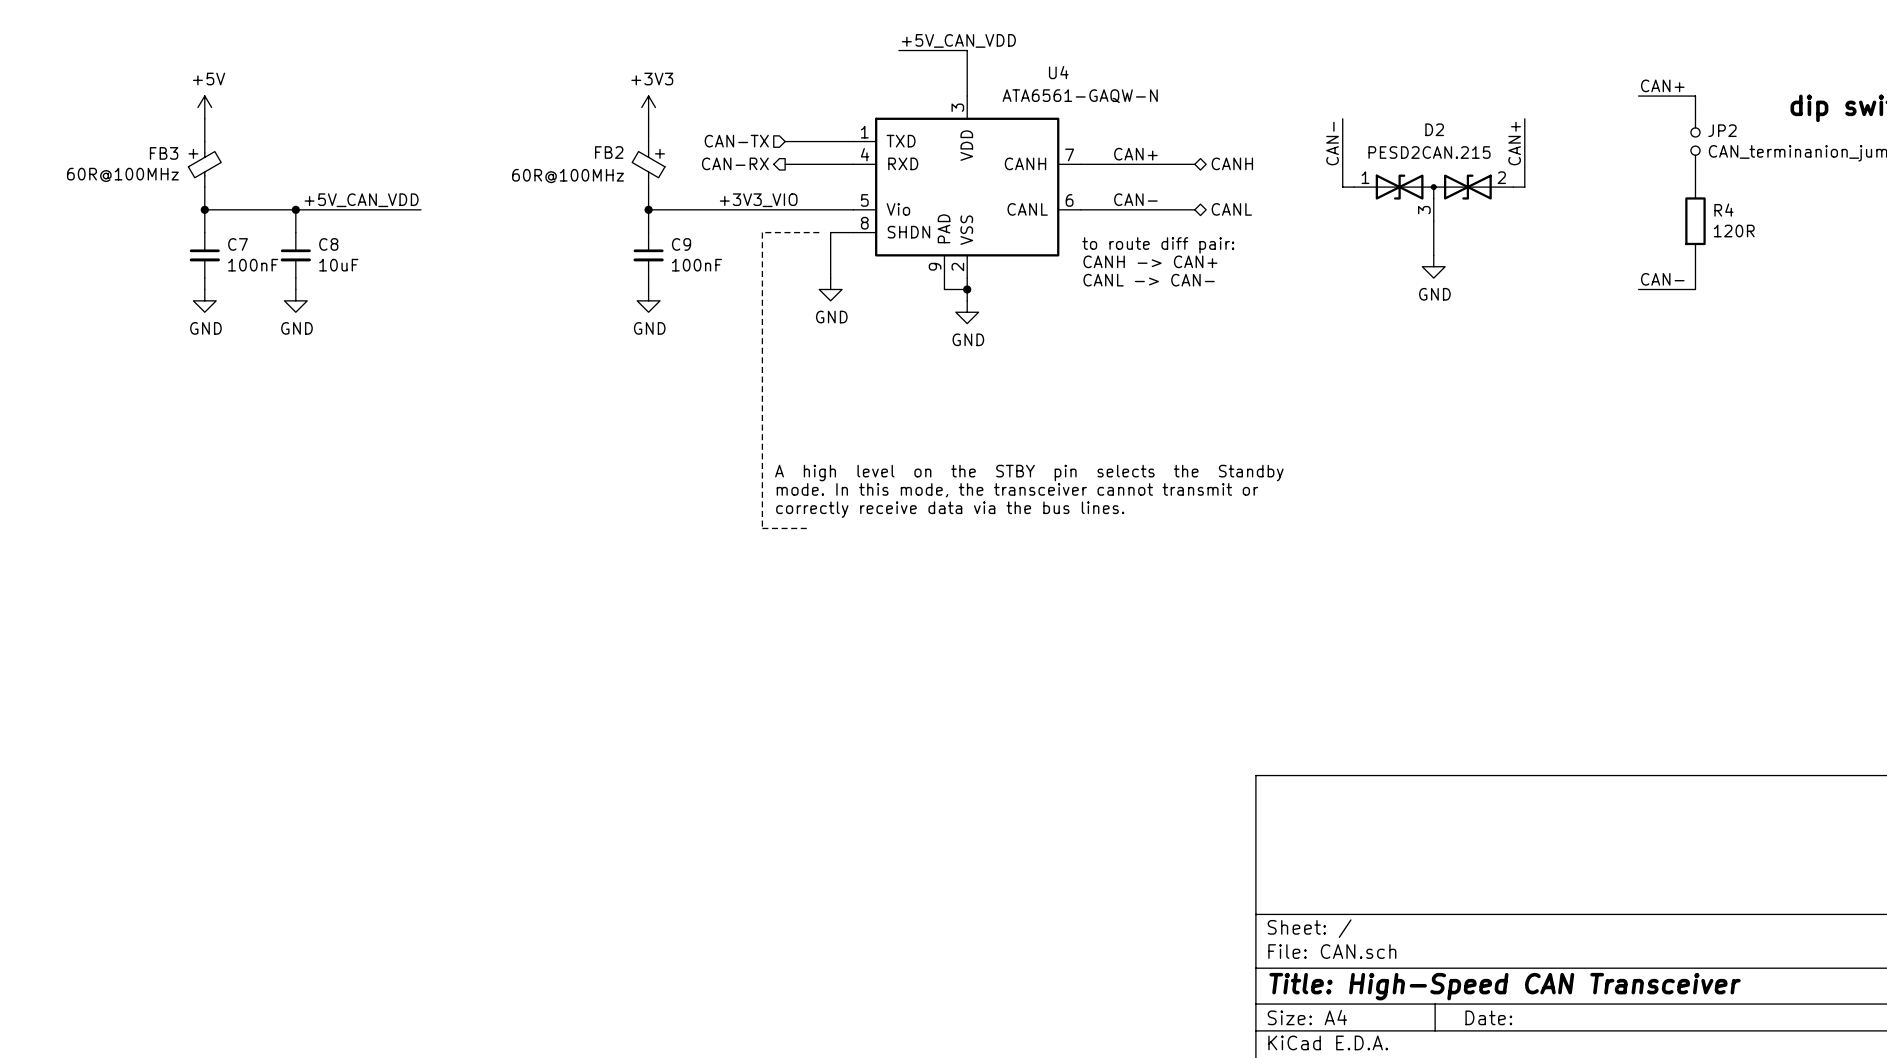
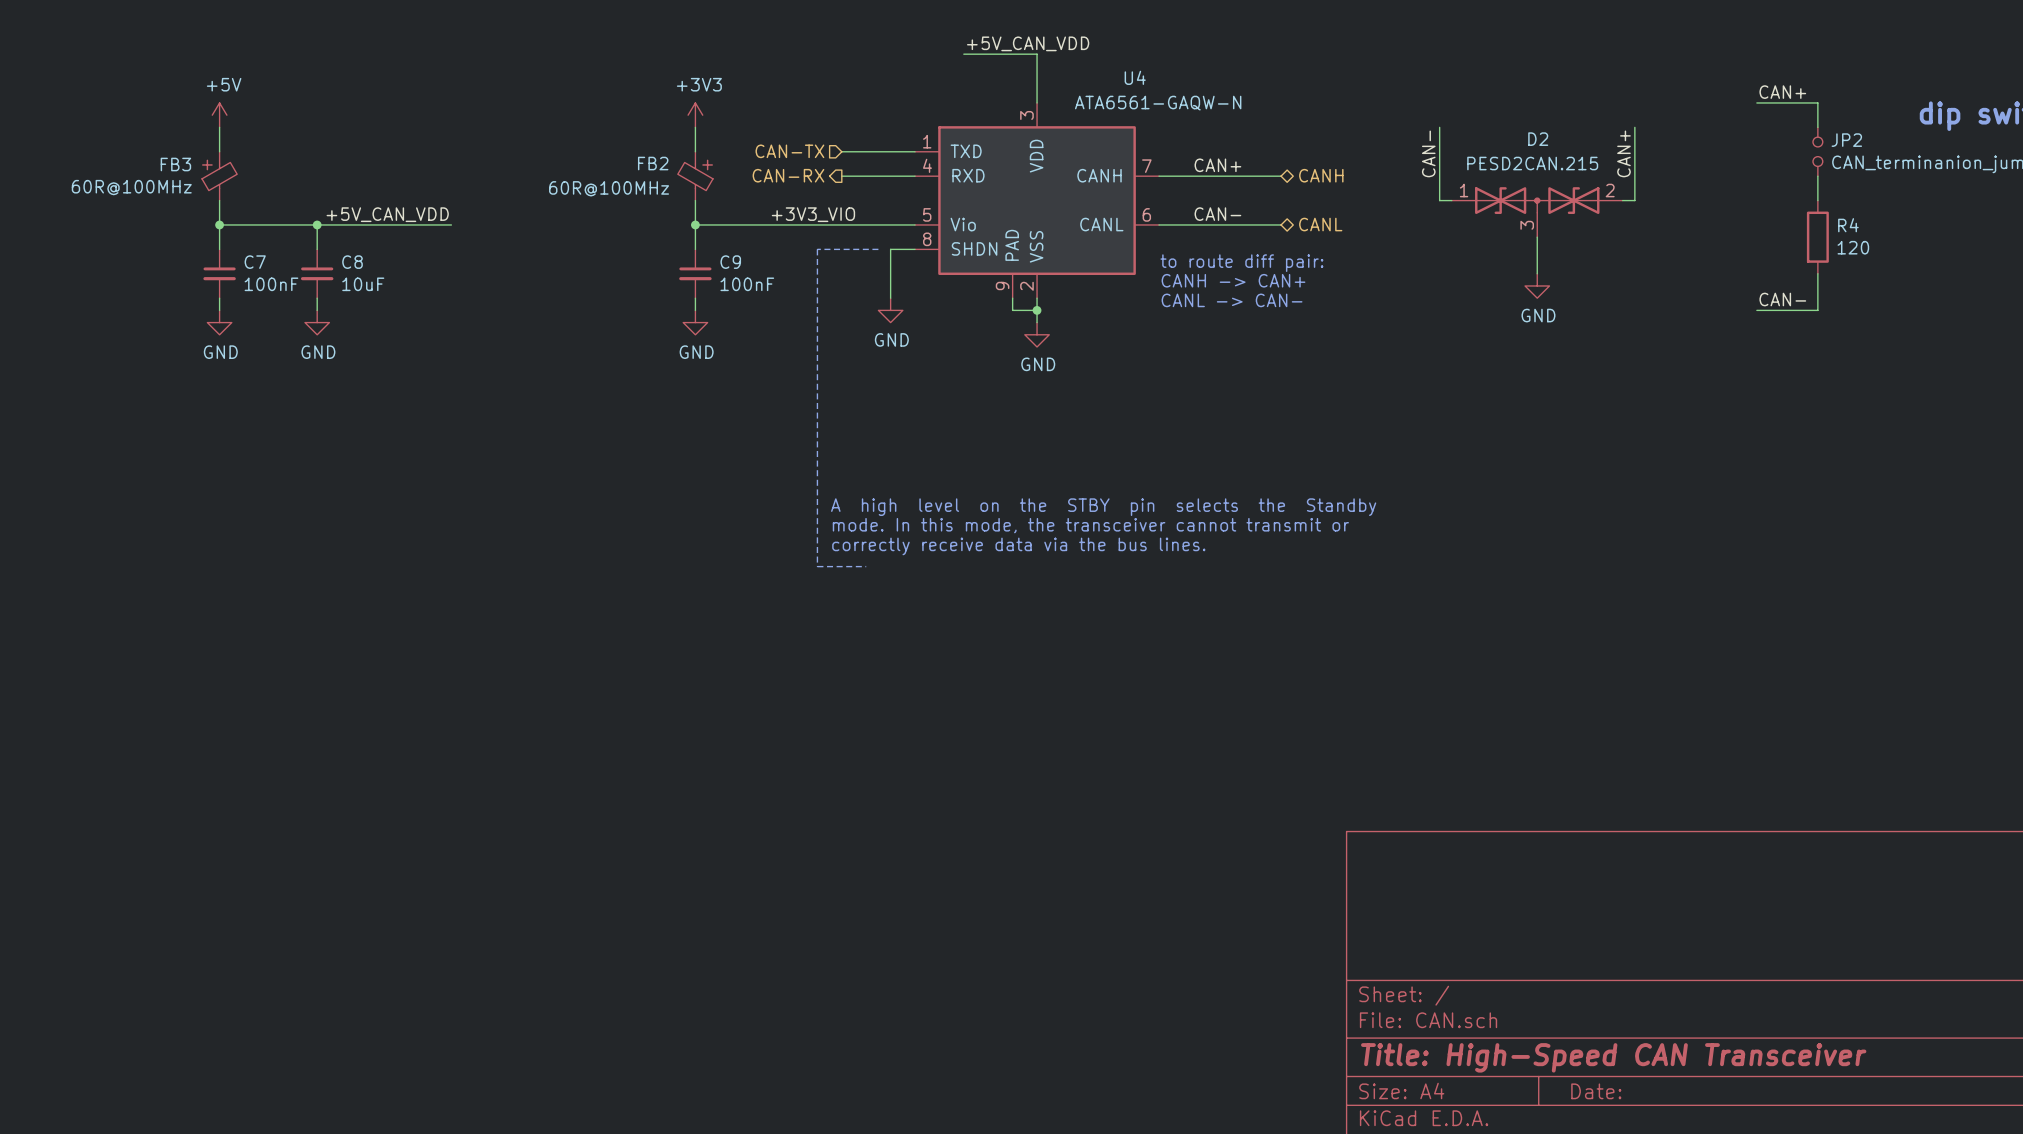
R4 value: 120R (1734, 231) -> 120 (1853, 247)

